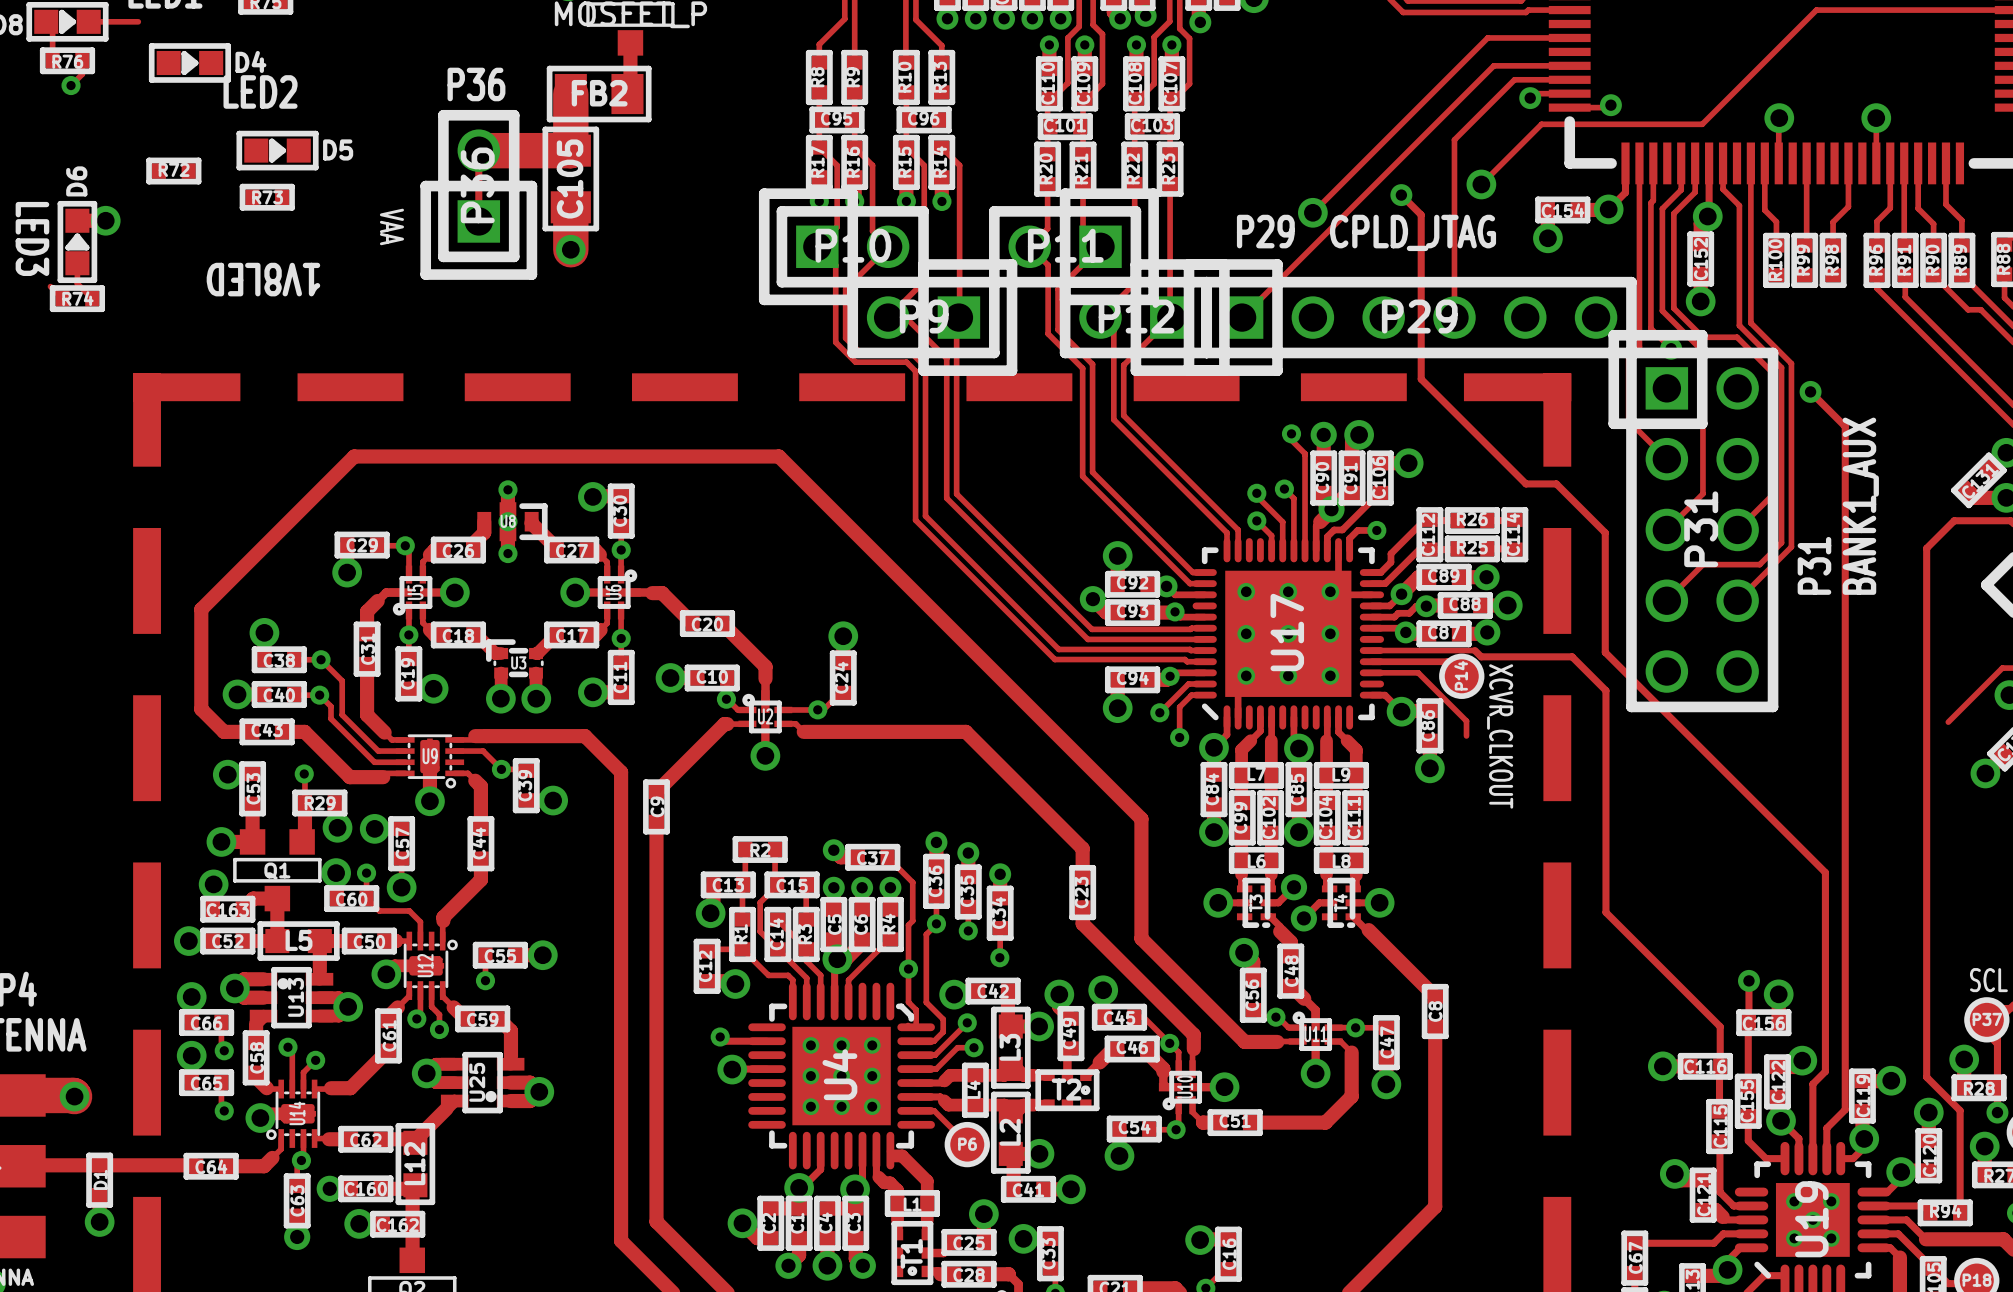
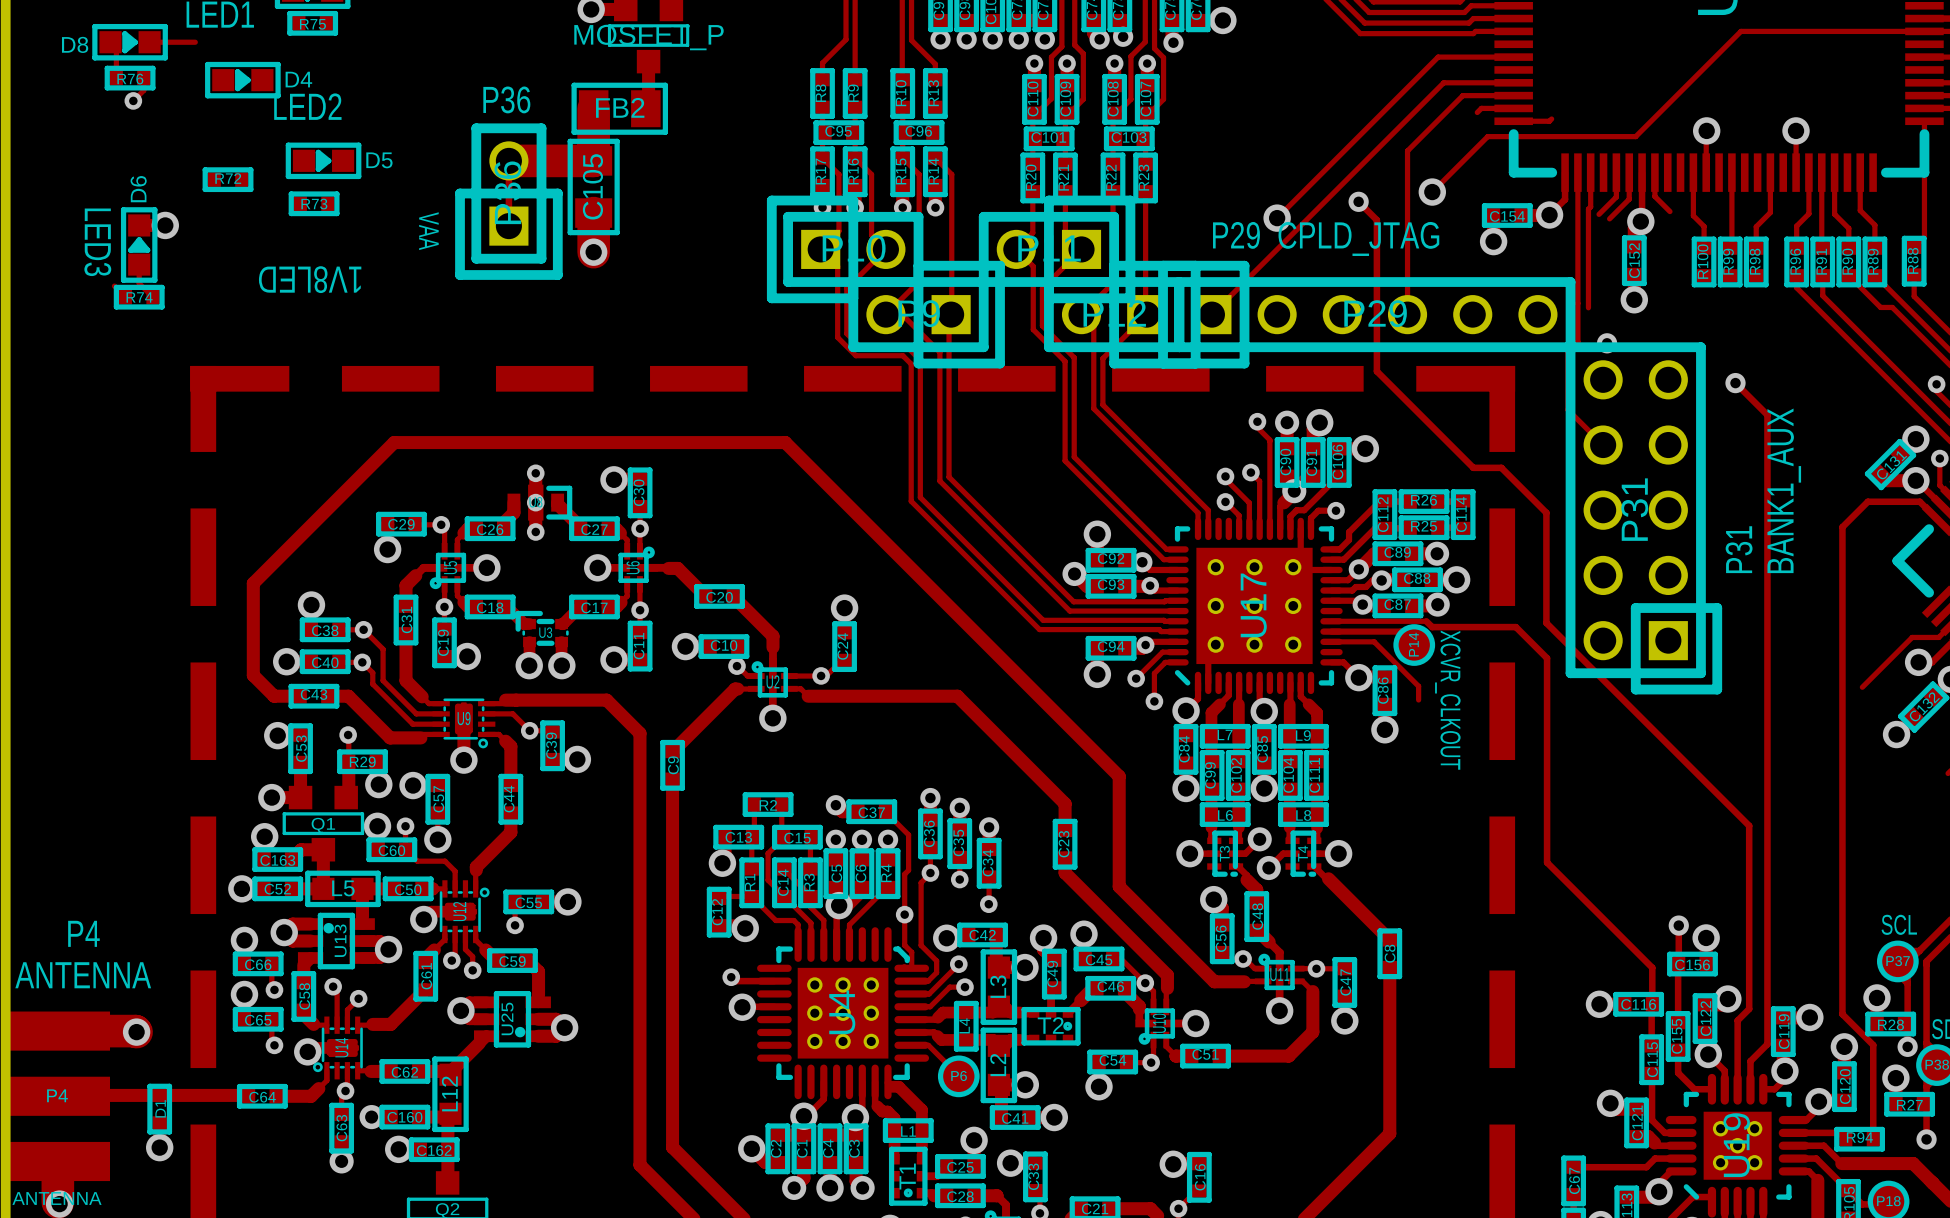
via: (1530, 98) -> none
via: (1610, 105) -> none
track: (1750, 163) (1750, 323) (1791, 363) (1791, 546) (1737, 600) -> none
track: (1739, 205) (1739, 325) (1781, 367) (1781, 542) (1759, 564) (1702, 564) (1666, 600) -> none
track: (1662, 208) (1662, 310) (1702, 351) (1702, 493) (1666, 529) -> none
track: (1673, 213) (1673, 308) (1702, 337) (1737, 337) (1771, 371) (1771, 495) (1737, 529) -> none
track: (1650, 310) (1650, 328) (1671, 348) -> none
P31 rotation: 0° (1693, 521) -> 180° (1643, 518)

